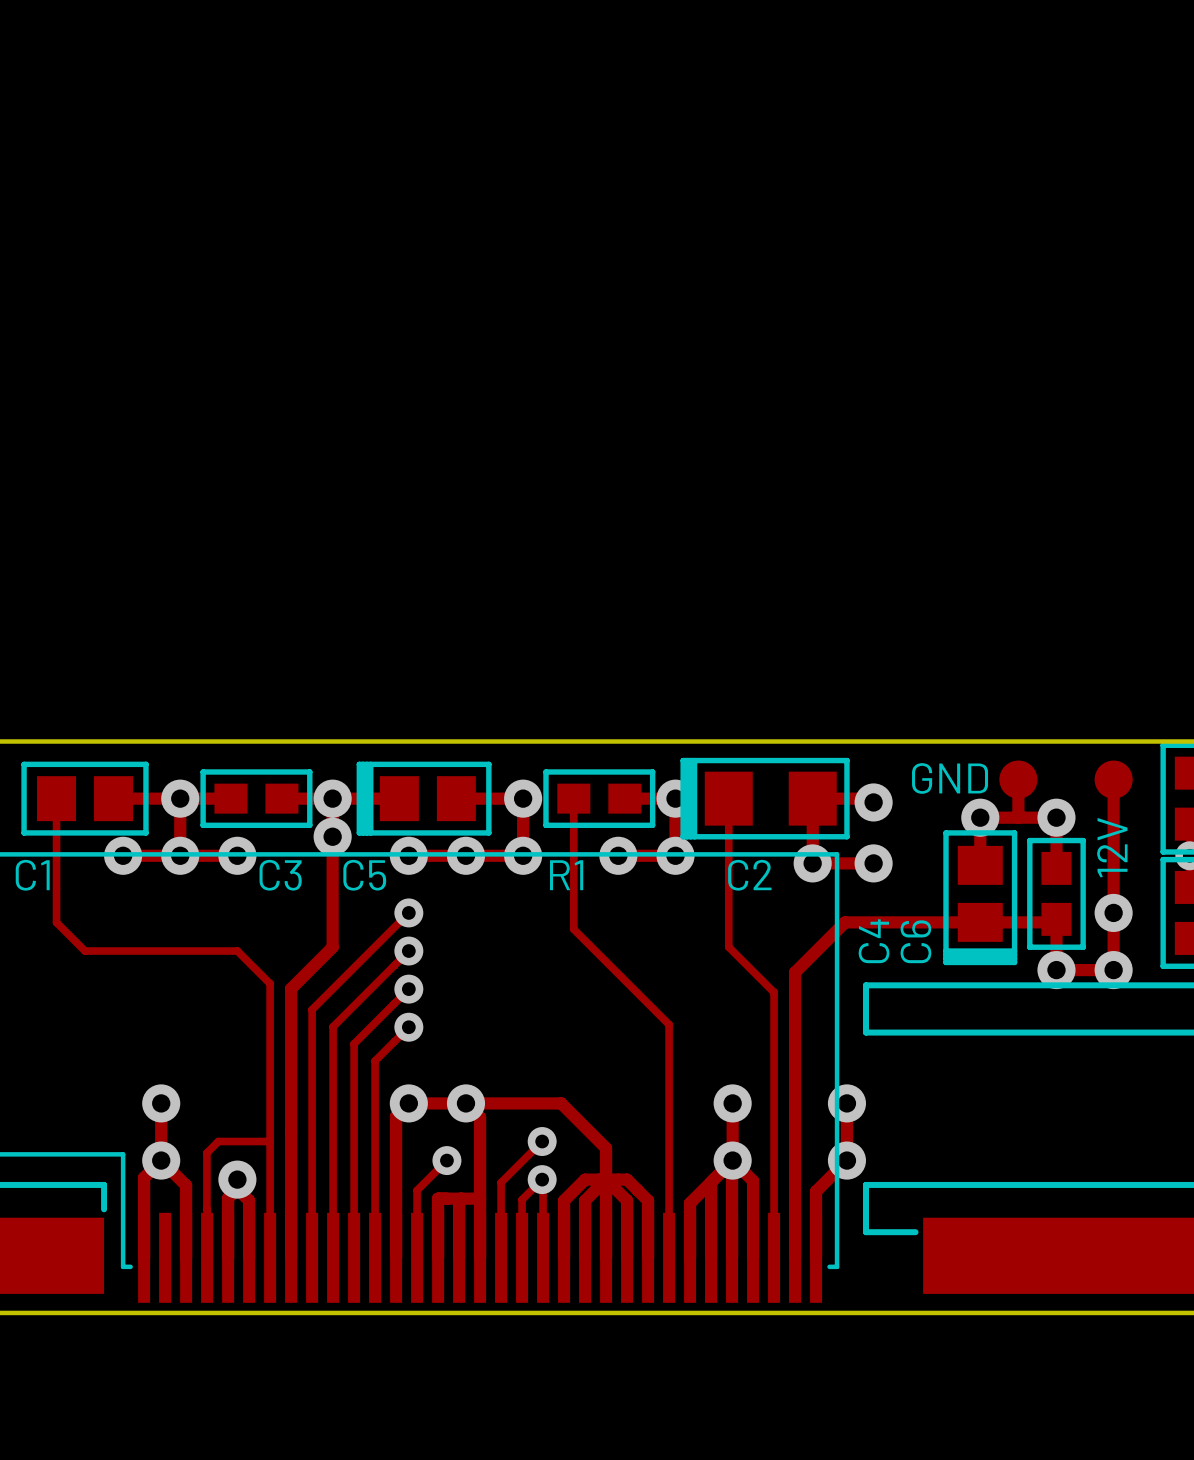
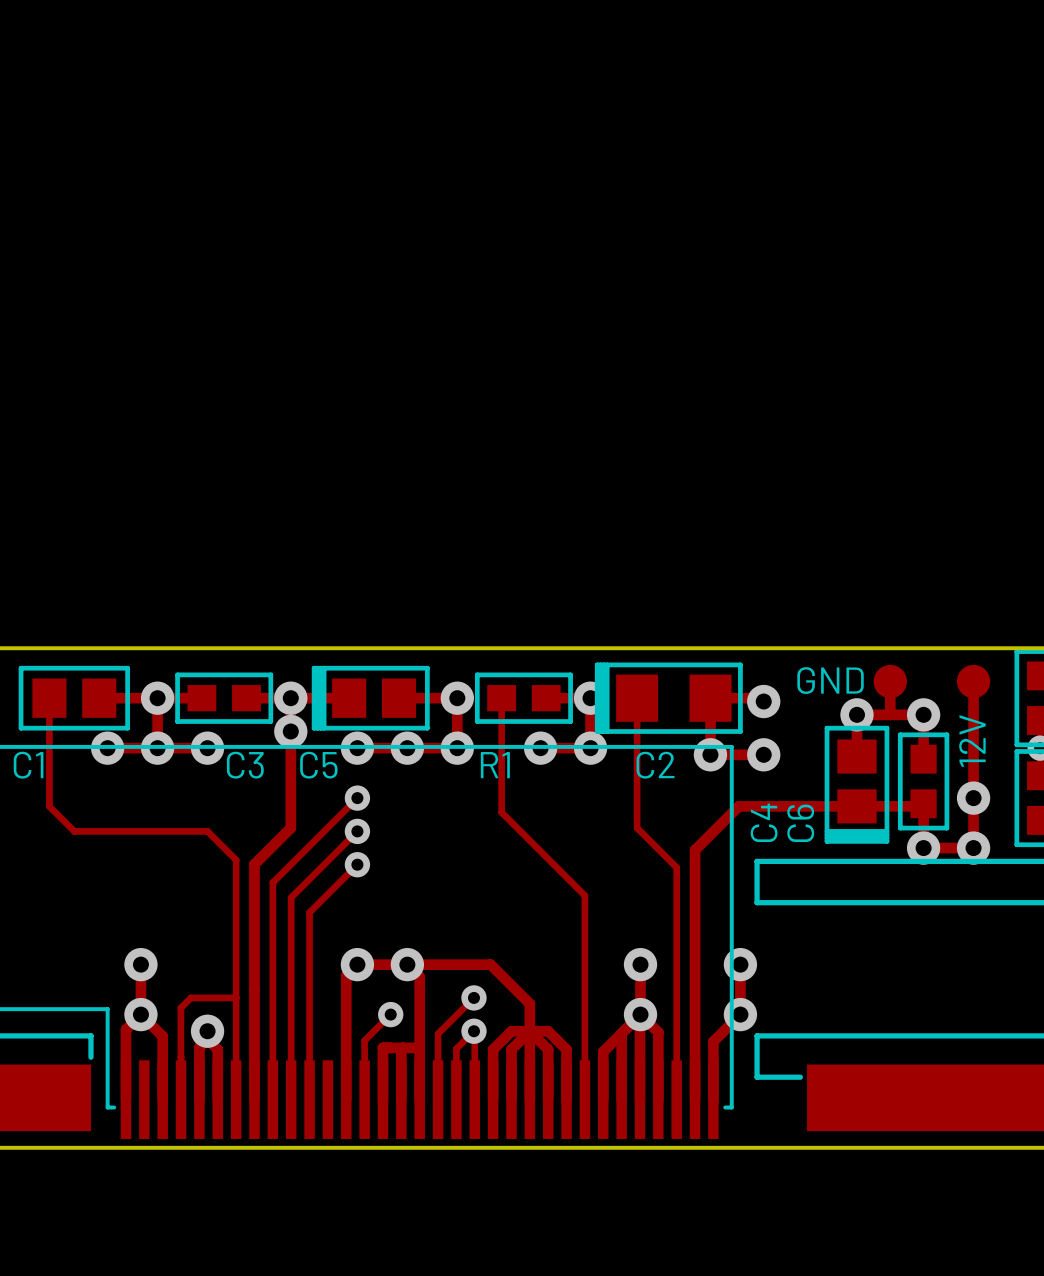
track: (408, 1027) (375, 1060) (375, 1257) -> none
via: (408, 1027) -> none

